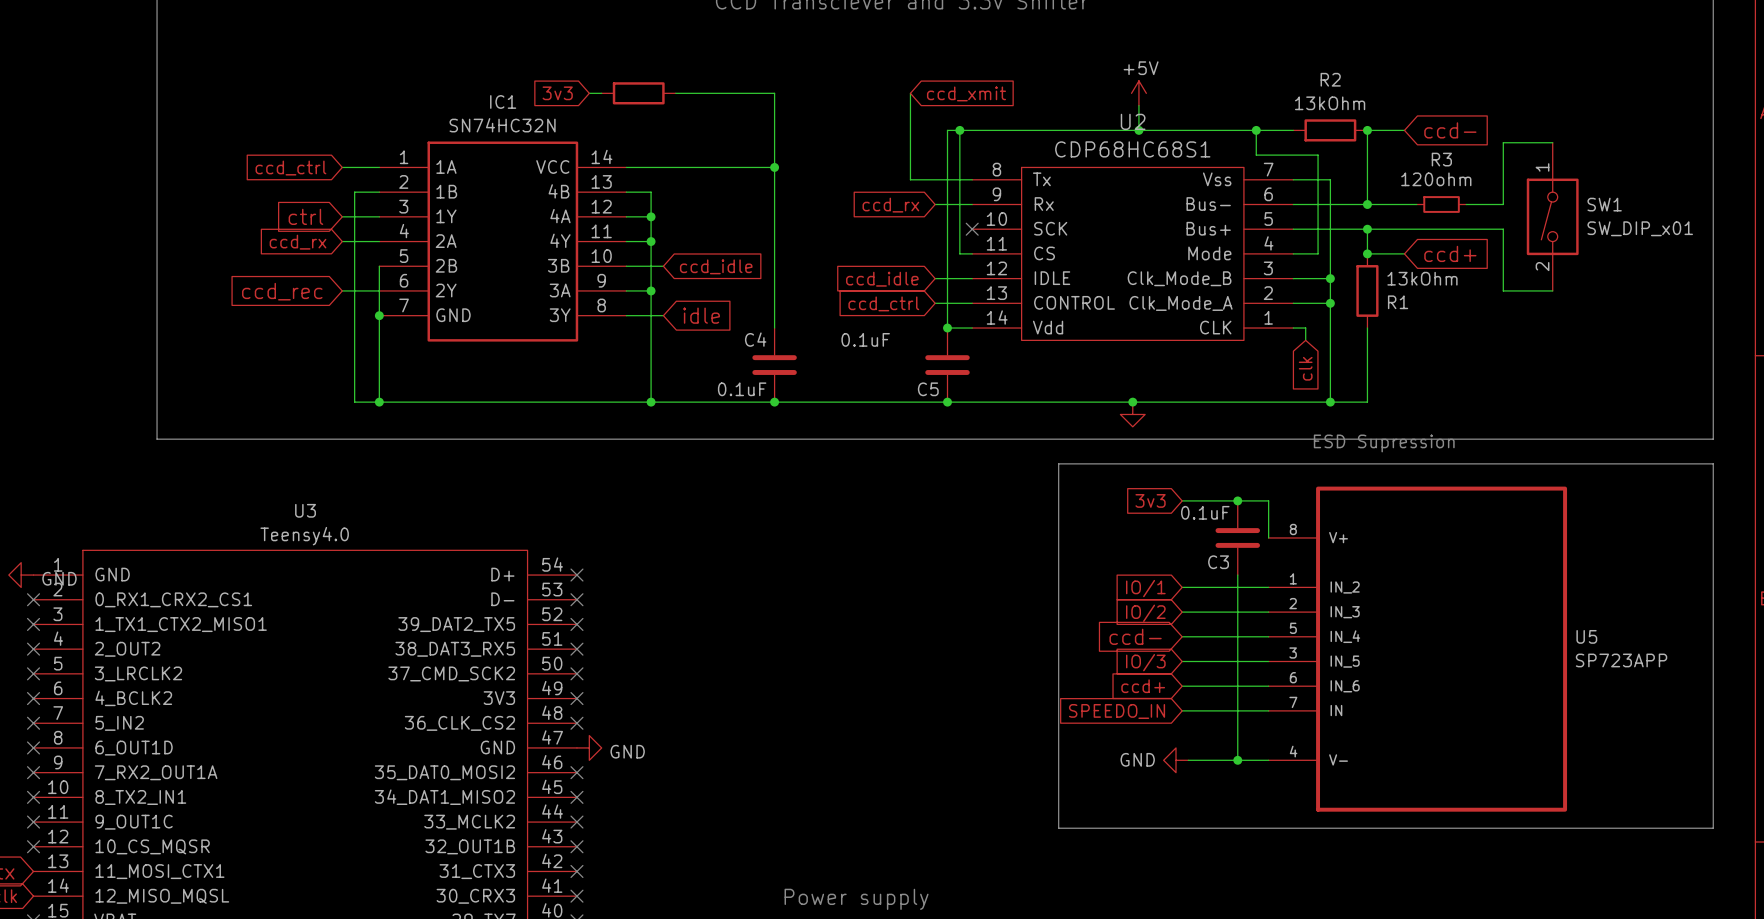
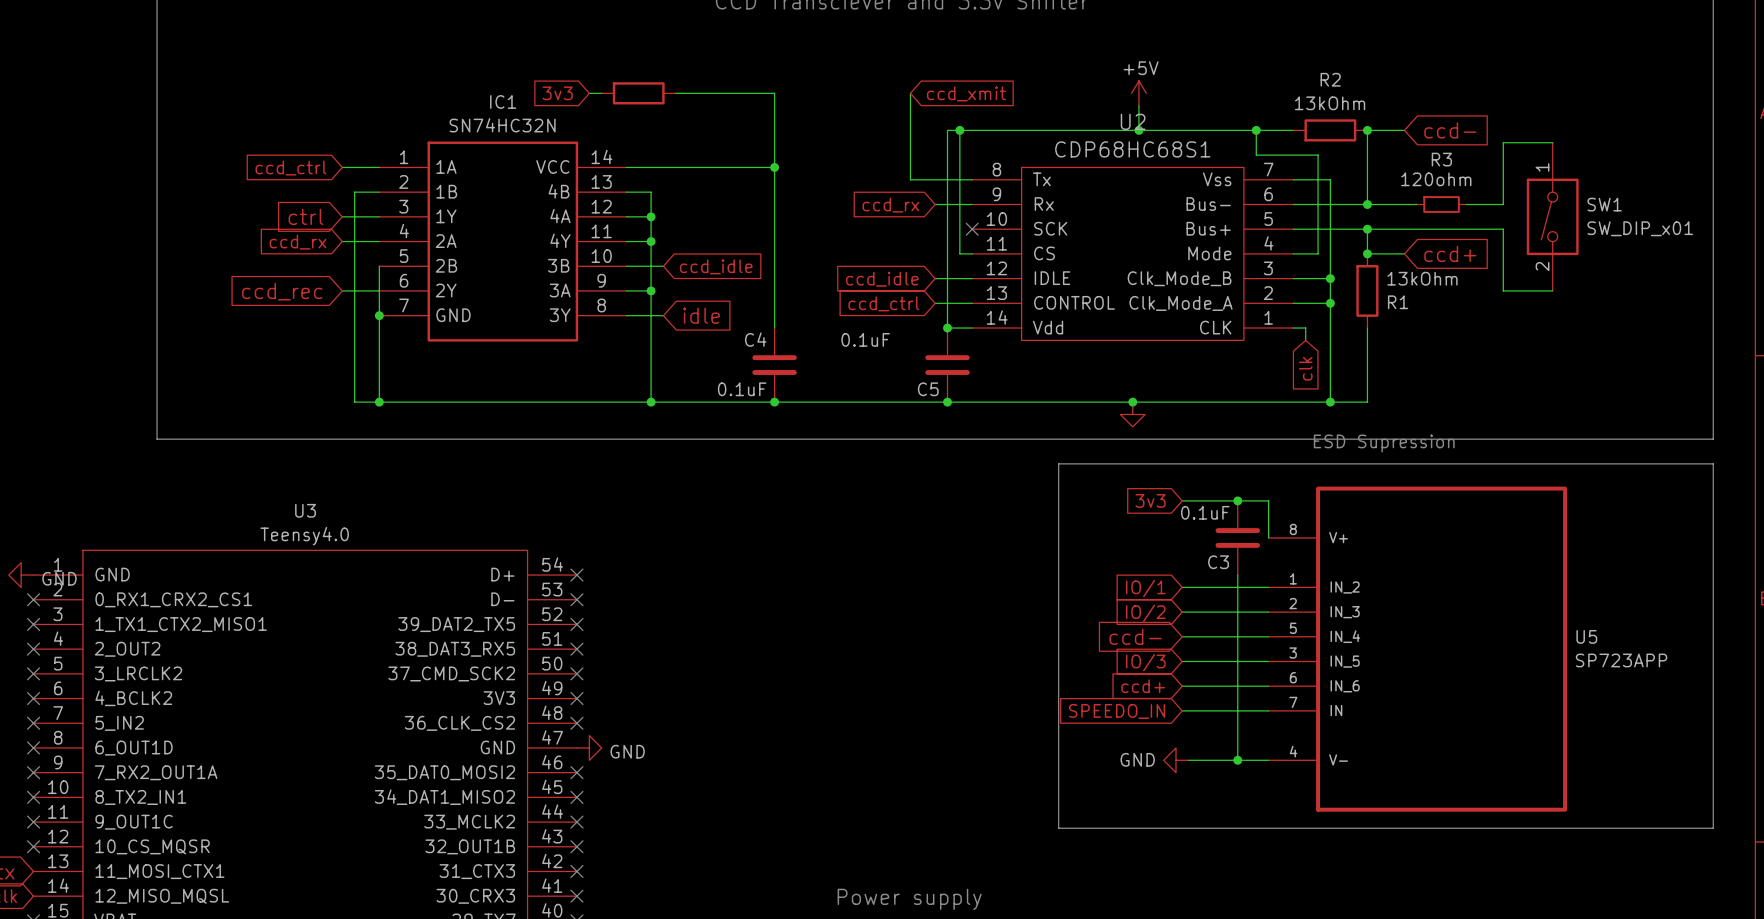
text position: Power supply (856, 899) -> Power supply (909, 899)

